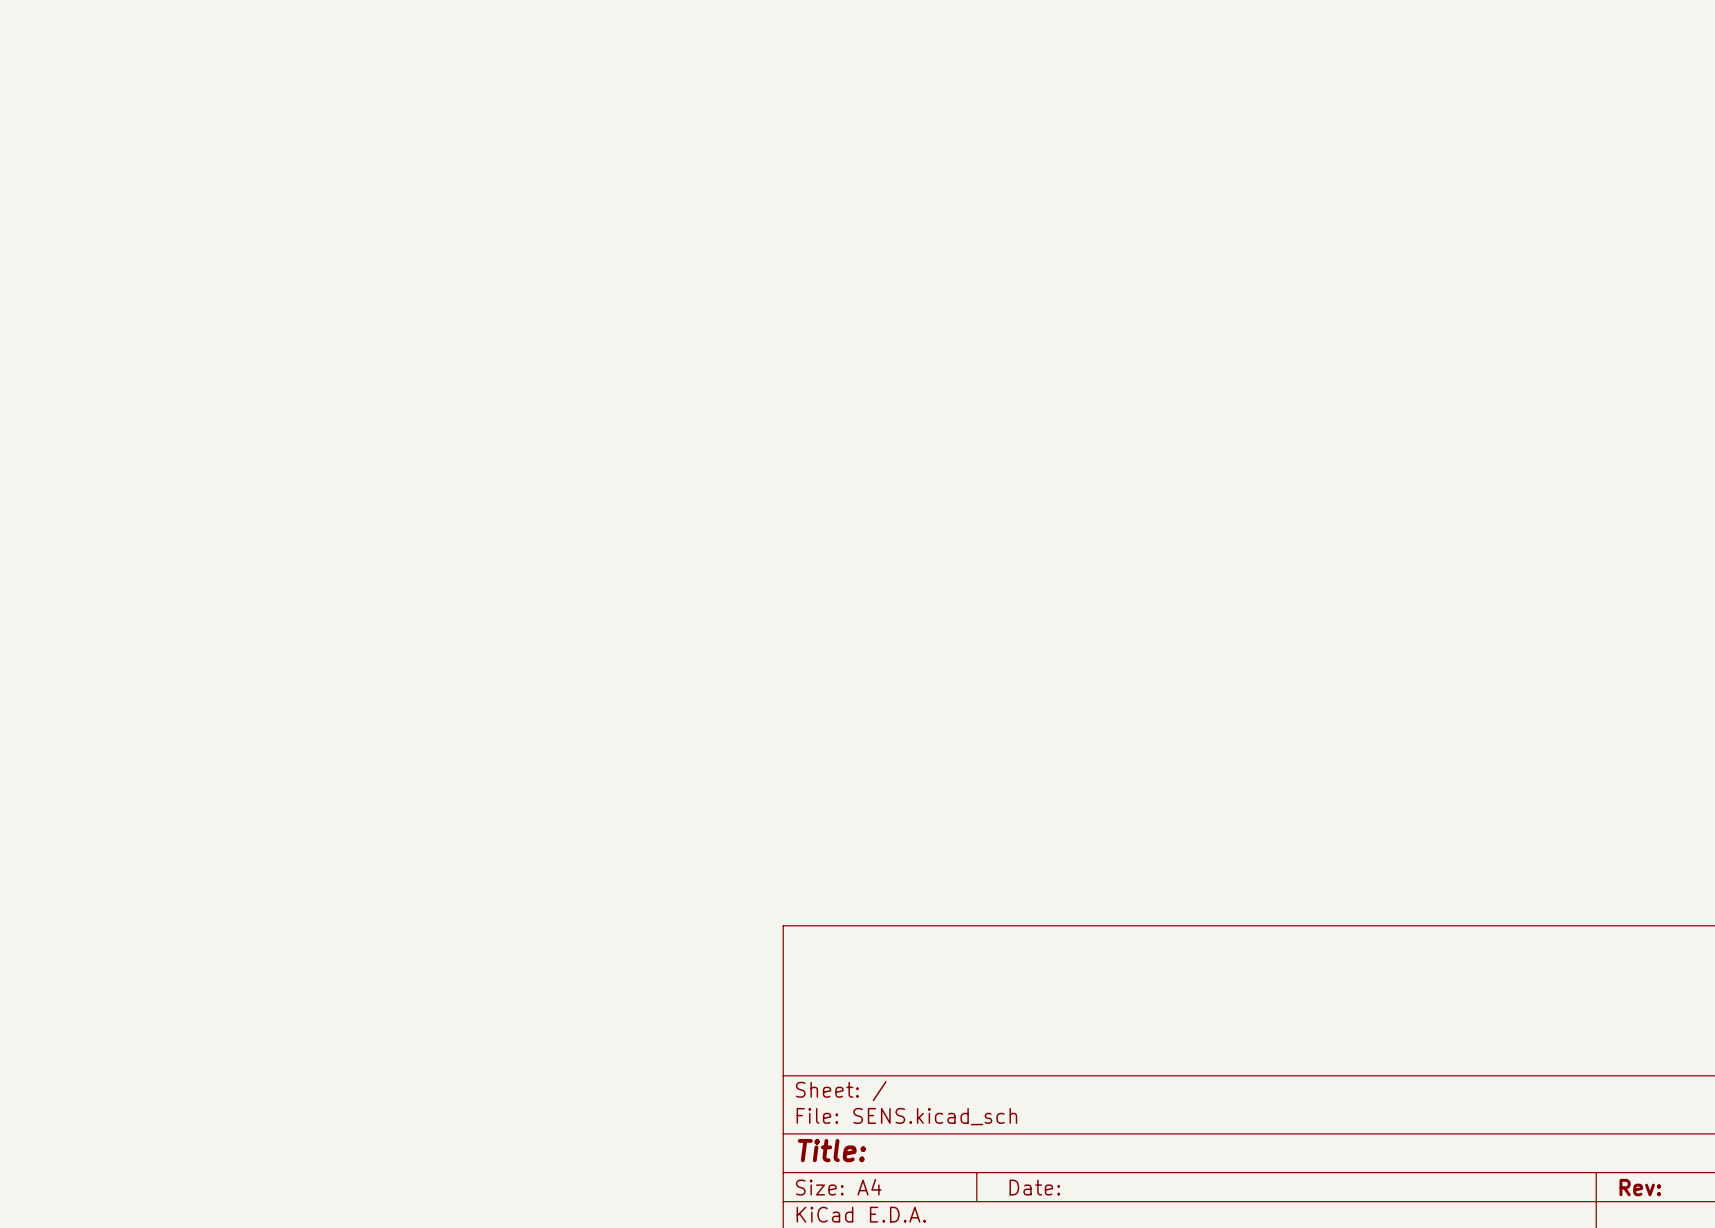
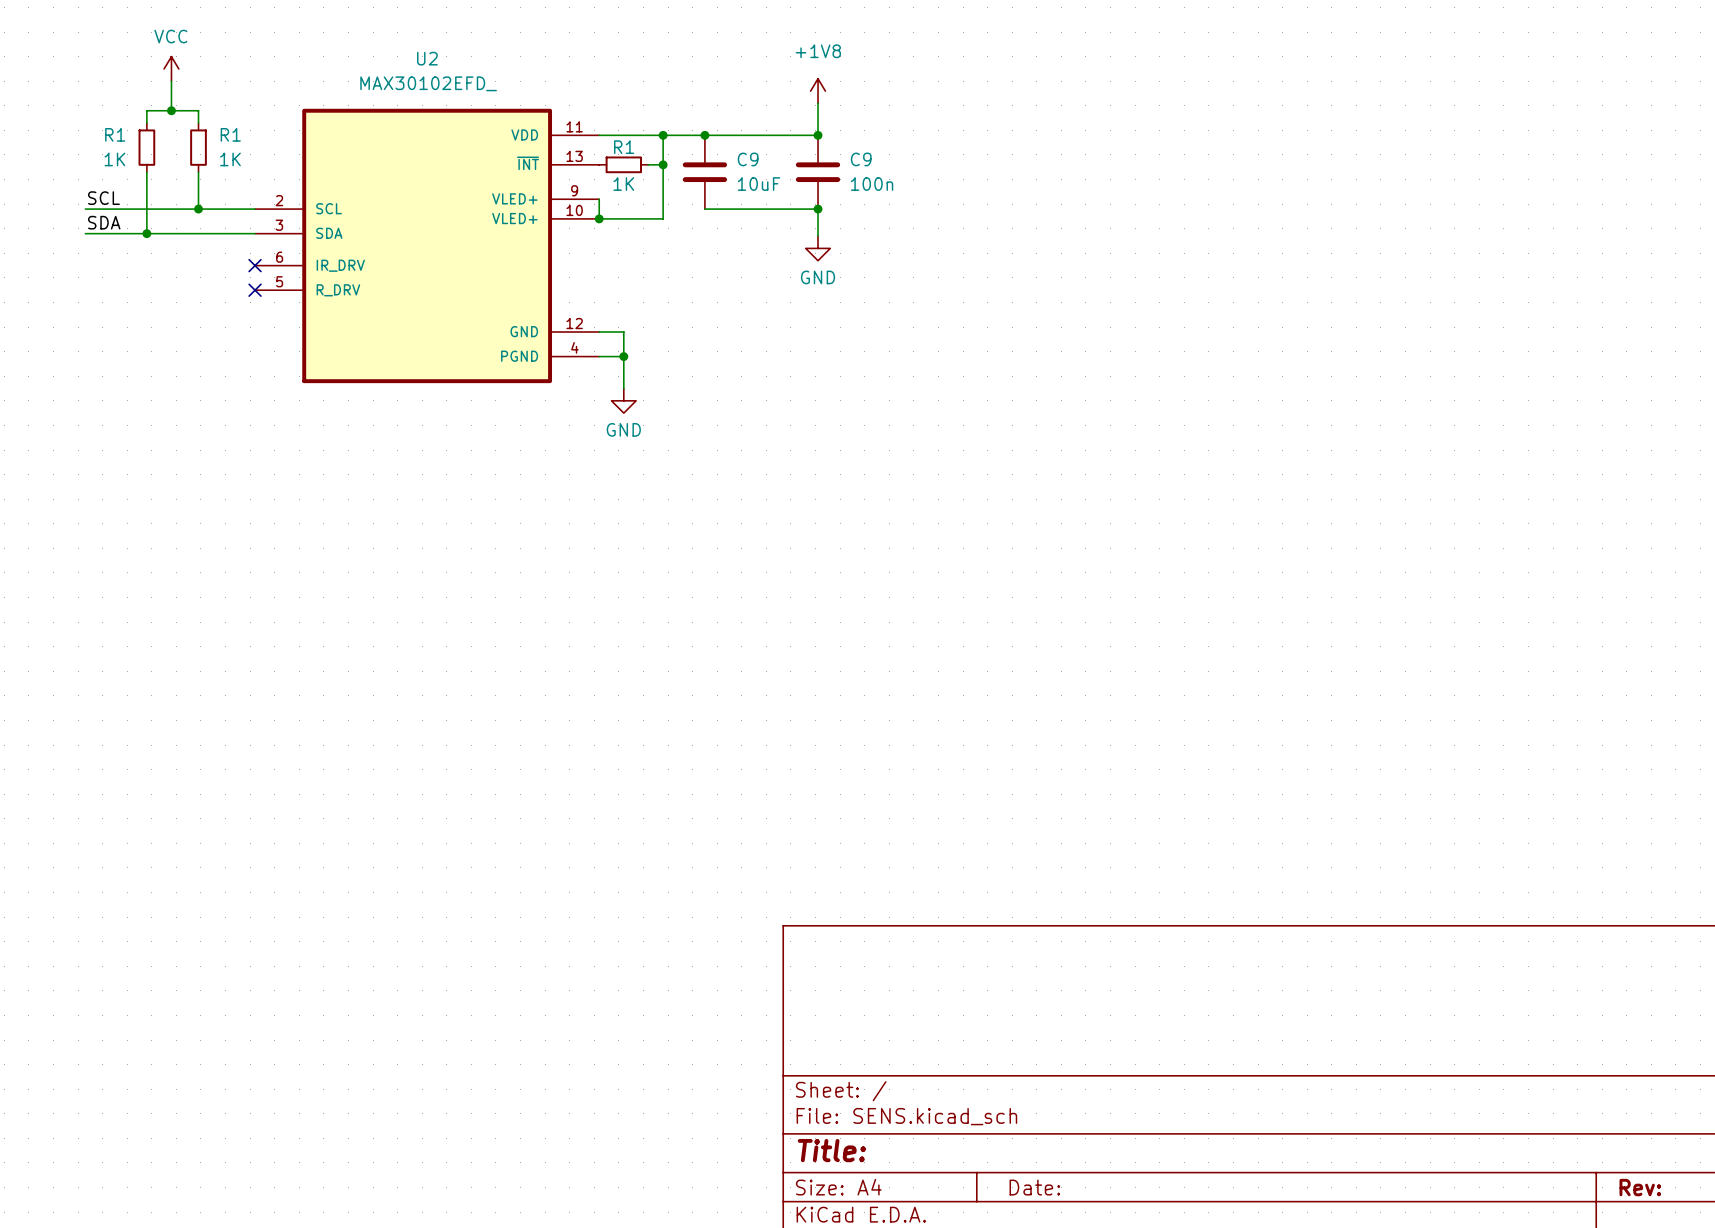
power symbol: none -> VCC (171, 68)
wire: none -> (171, 81) (171, 110)
power symbol: none -> +1V8 (818, 91)
wire: none -> (818, 103) (818, 135) (599, 135)
junction: none -> (171, 110)
wire: none -> (146, 123) (146, 110) (198, 110) (198, 123)
wire: none -> (663, 135) (663, 218) (599, 218) (599, 199)
junction: none -> (663, 135)
junction: none -> (704, 135)
junction: none -> (818, 135)
R1: none -> 1K (146, 147)
R1: none -> 1K (198, 147)
R1: none -> 1K (623, 164)
wire: none -> (648, 164) (663, 164)
junction: none -> (663, 164)
wire: none -> (146, 172) (146, 233)
wire: none -> (198, 172) (198, 209)
C9: none -> 10uF (704, 172)
C9: none -> 100n (818, 172)
label: none -> SCL (103, 198)
wire: none -> (85, 209) (255, 209)
junction: none -> (198, 209)
wire: none -> (704, 209) (818, 209) (818, 236)
junction: none -> (818, 209)
junction: none -> (599, 218)
label: none -> SDA (104, 222)
wire: none -> (85, 233) (255, 233)
junction: none -> (146, 233)
U2: none -> MAX30102EFD_ (427, 245)
power symbol: none -> GND (818, 248)
no-connect mark: none -> (255, 265)
no-connect mark: none -> (255, 290)
wire: none -> (599, 332) (623, 332) (623, 388)
wire: none -> (599, 356) (623, 356)
junction: none -> (623, 356)
power symbol: none -> GND (623, 400)

